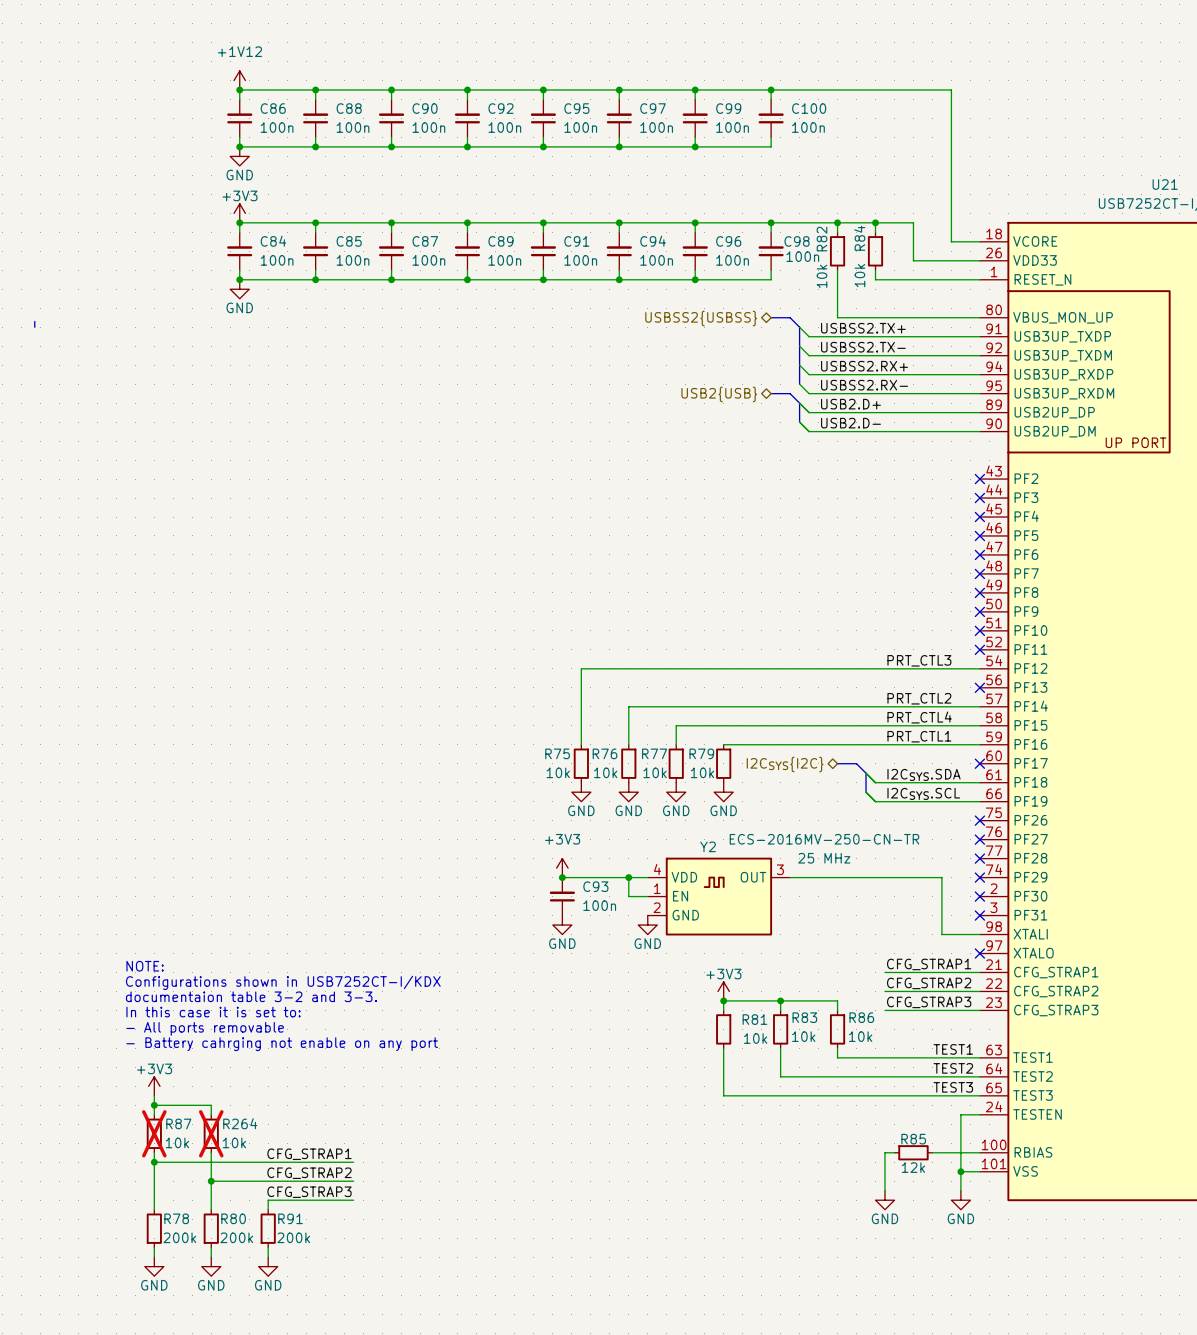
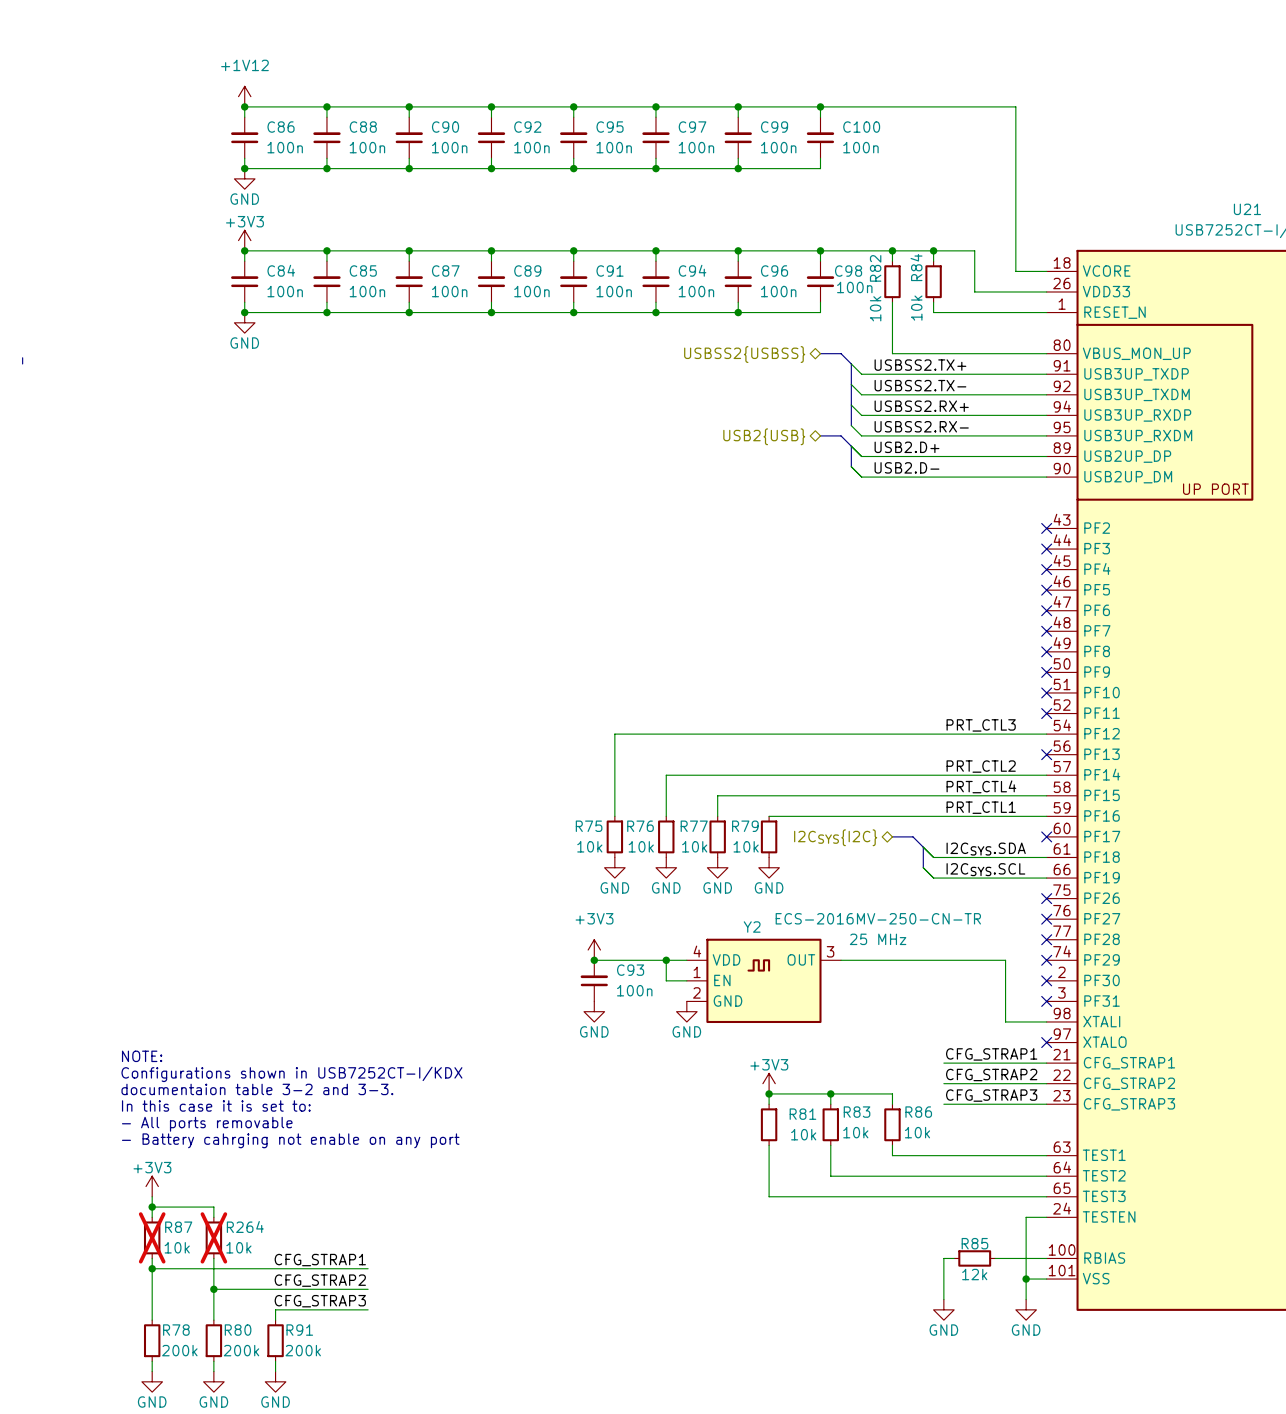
label: TEST1 (953, 1049) -> none
label: TEST2 (953, 1068) -> none
label: TEST3 (953, 1087) -> none

